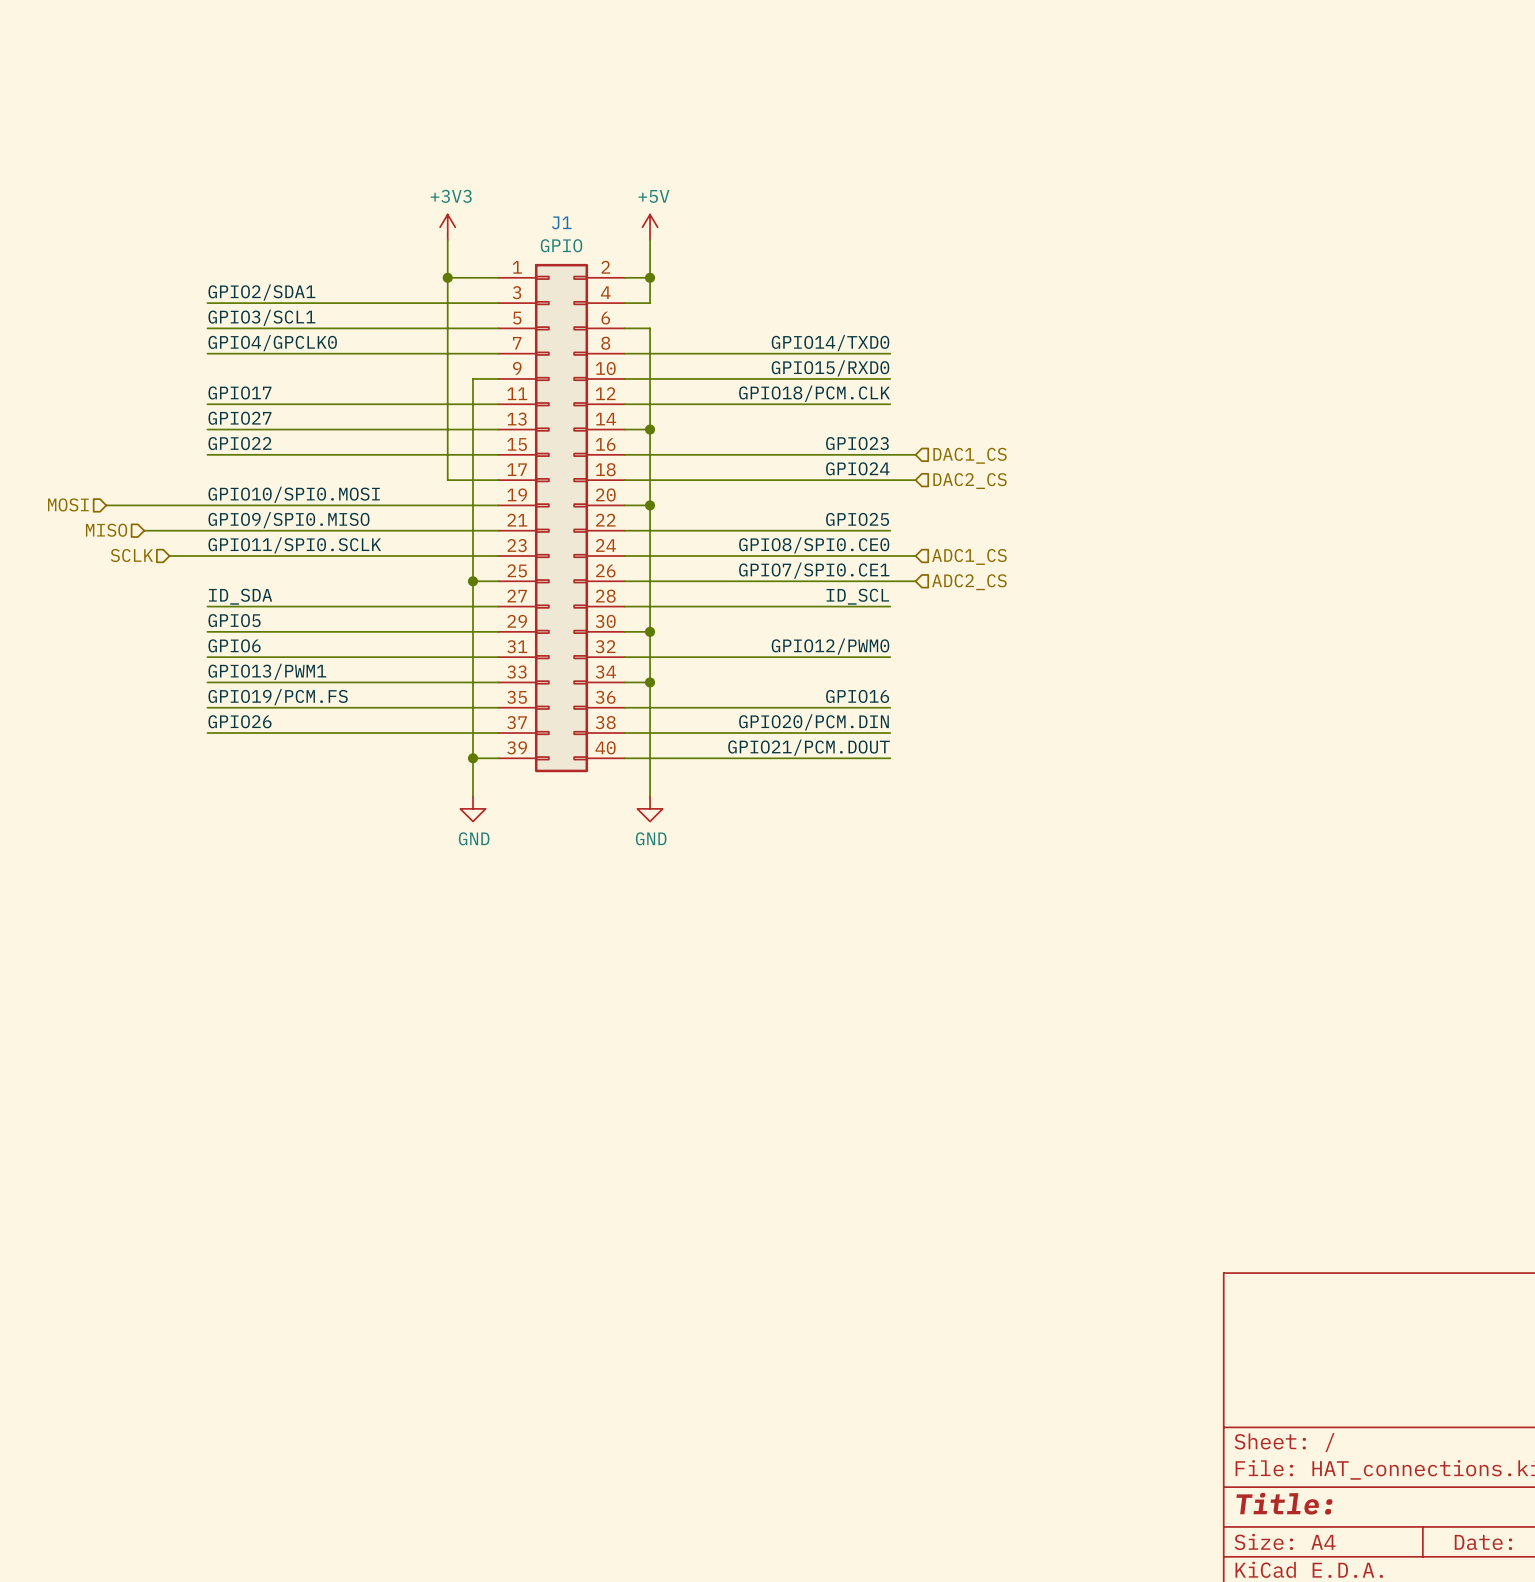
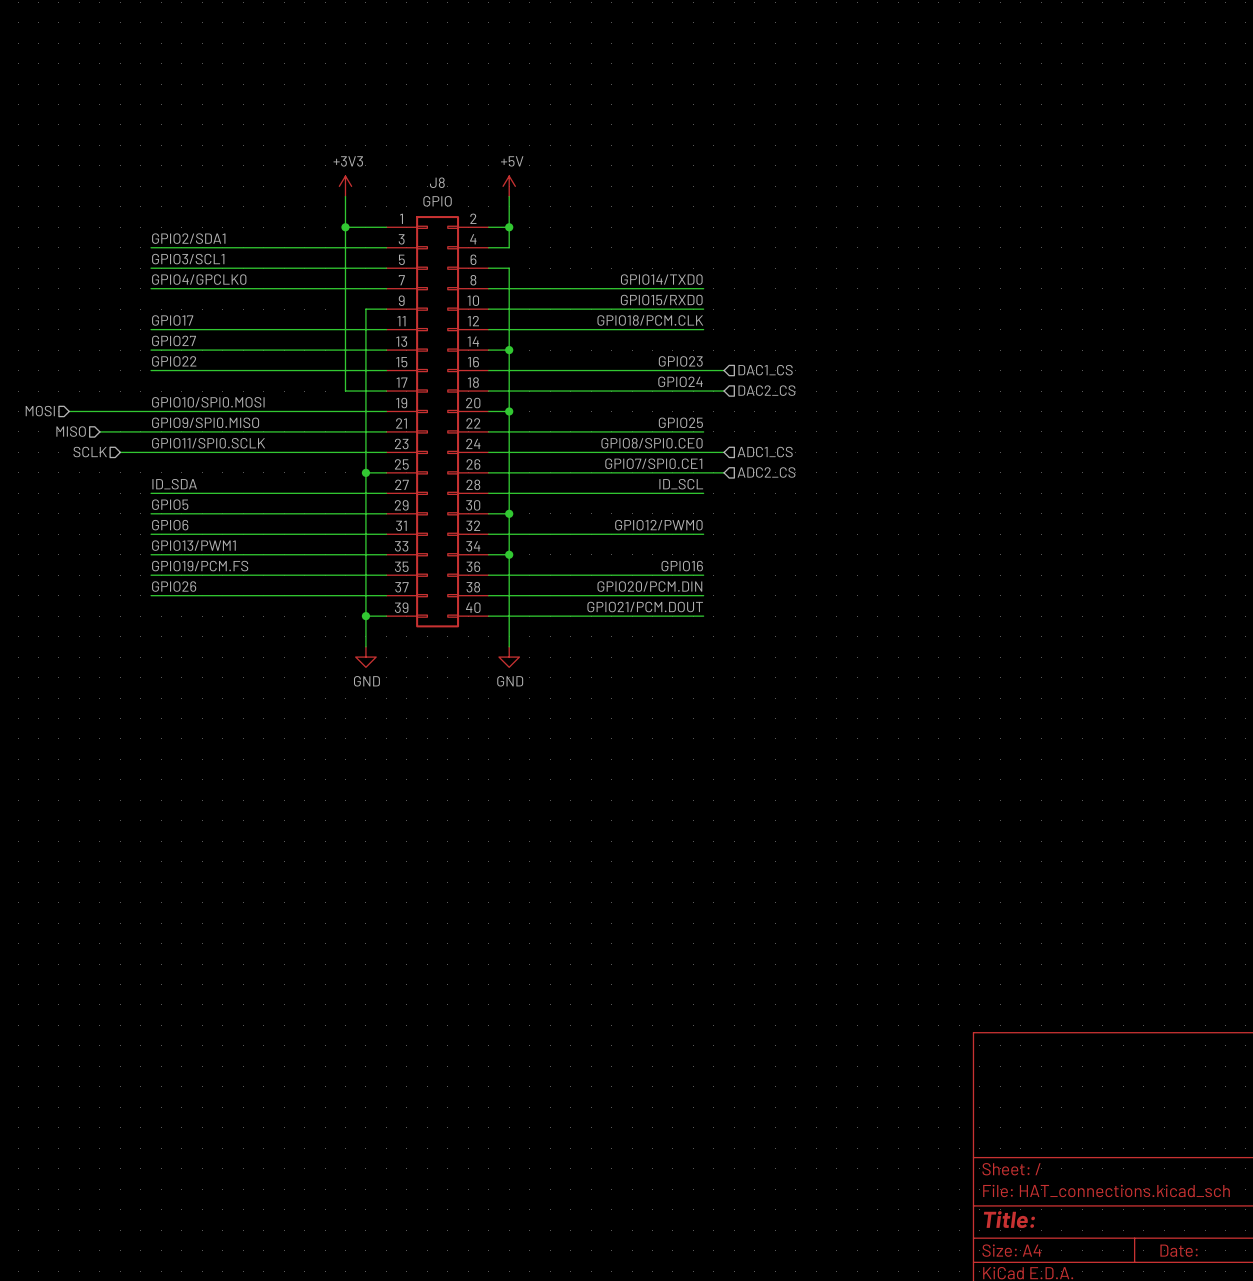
J1 name: J1 (561, 222) -> J8 (437, 182)

